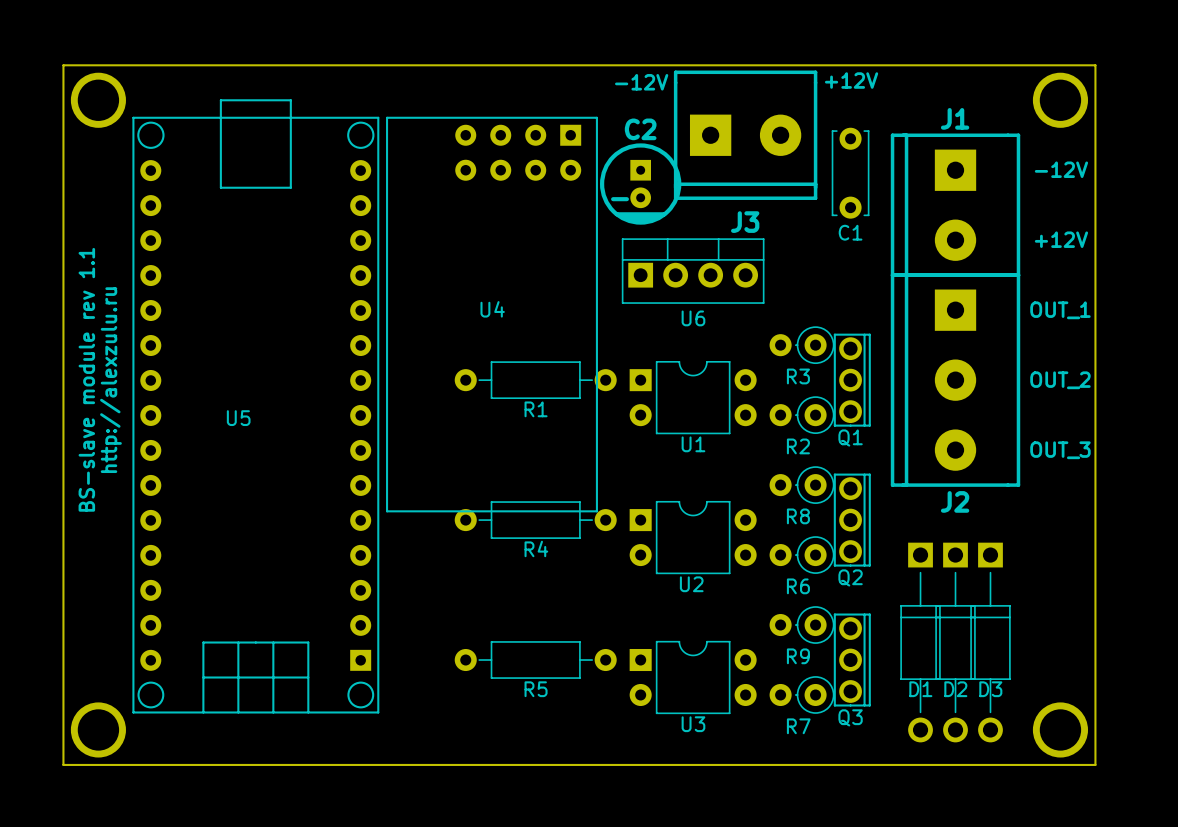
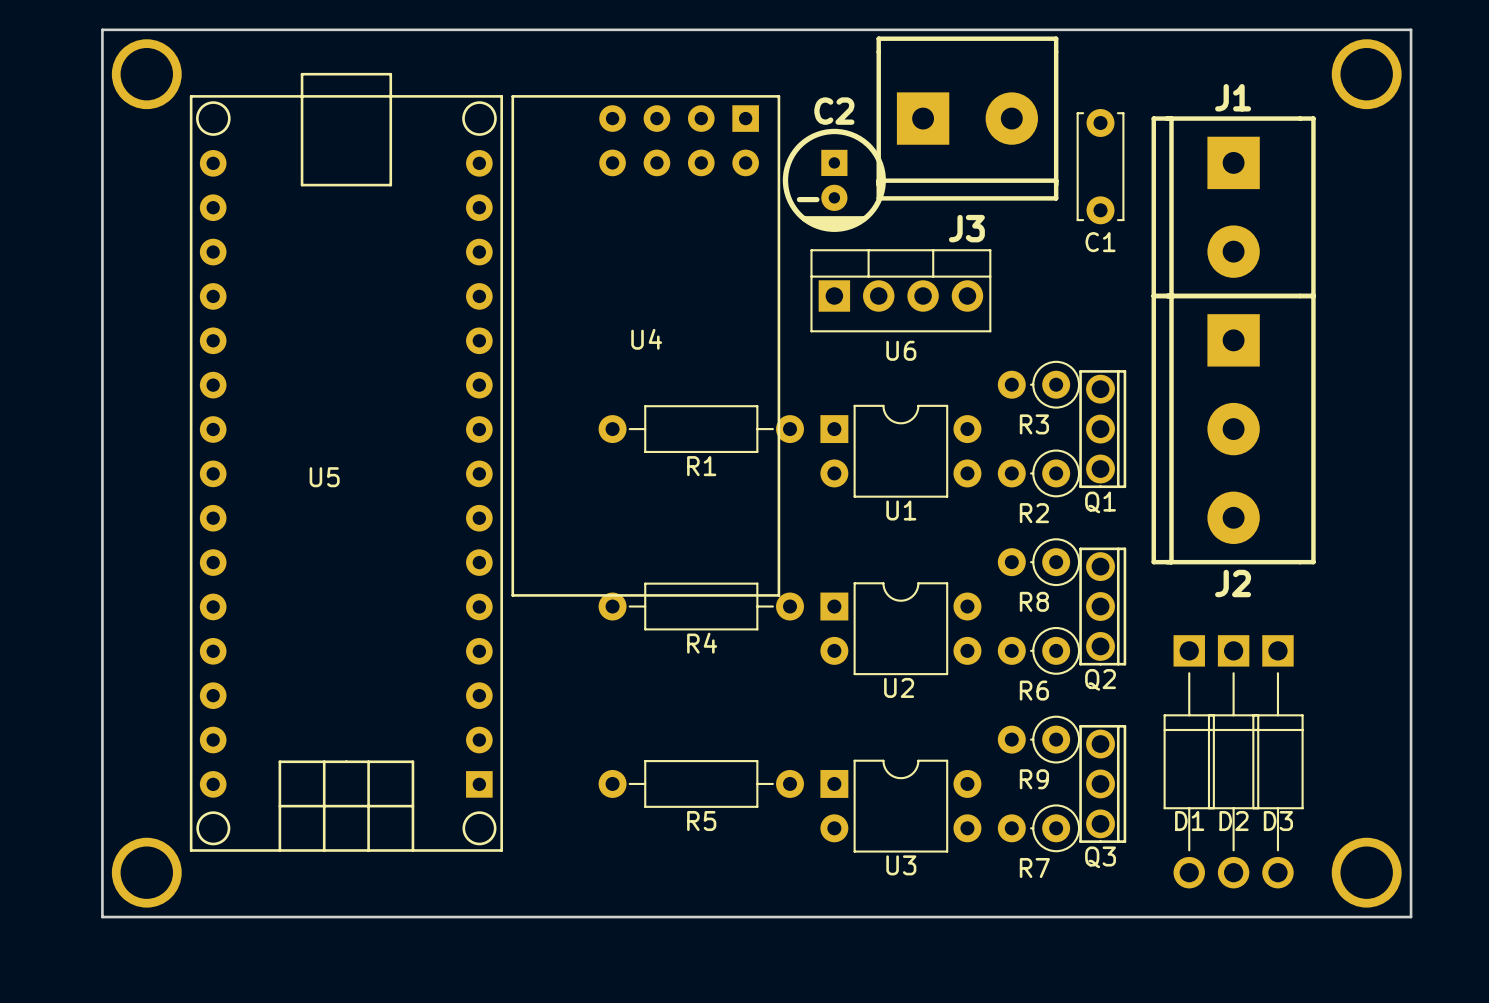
text: +12V (851, 80) -> none
text: -12V (641, 82) -> none
text: -12V (1061, 169) -> none
text: +12V (1061, 239) -> none
text: OUT_1 (1060, 310) -> none
text: BS-slave module rev 1.1 (86, 379) -> none
text: http://alexzulu.ru (110, 380) -> none
text: OUT_2 (1060, 380) -> none
text: OUT_3 (1060, 450) -> none

